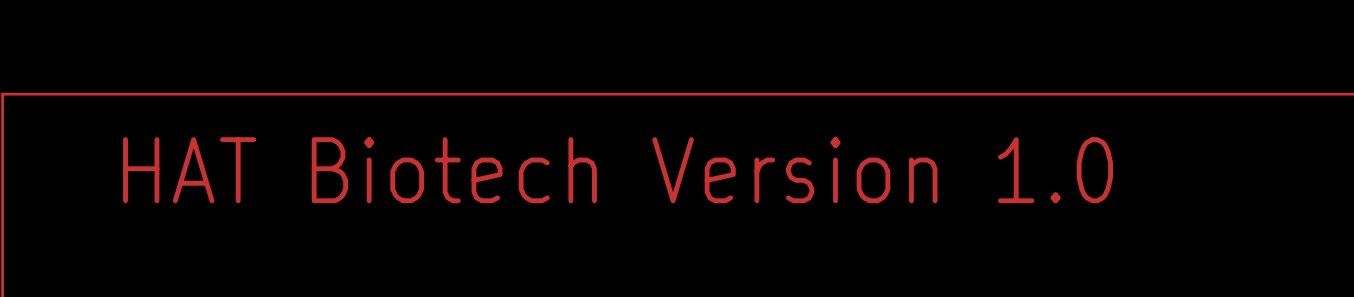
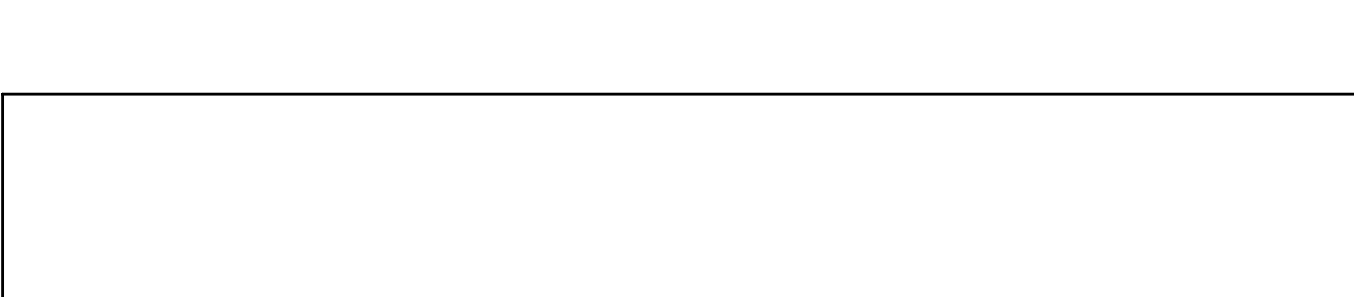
text: HAT Biotech Version 1.0 (618, 170) -> none

